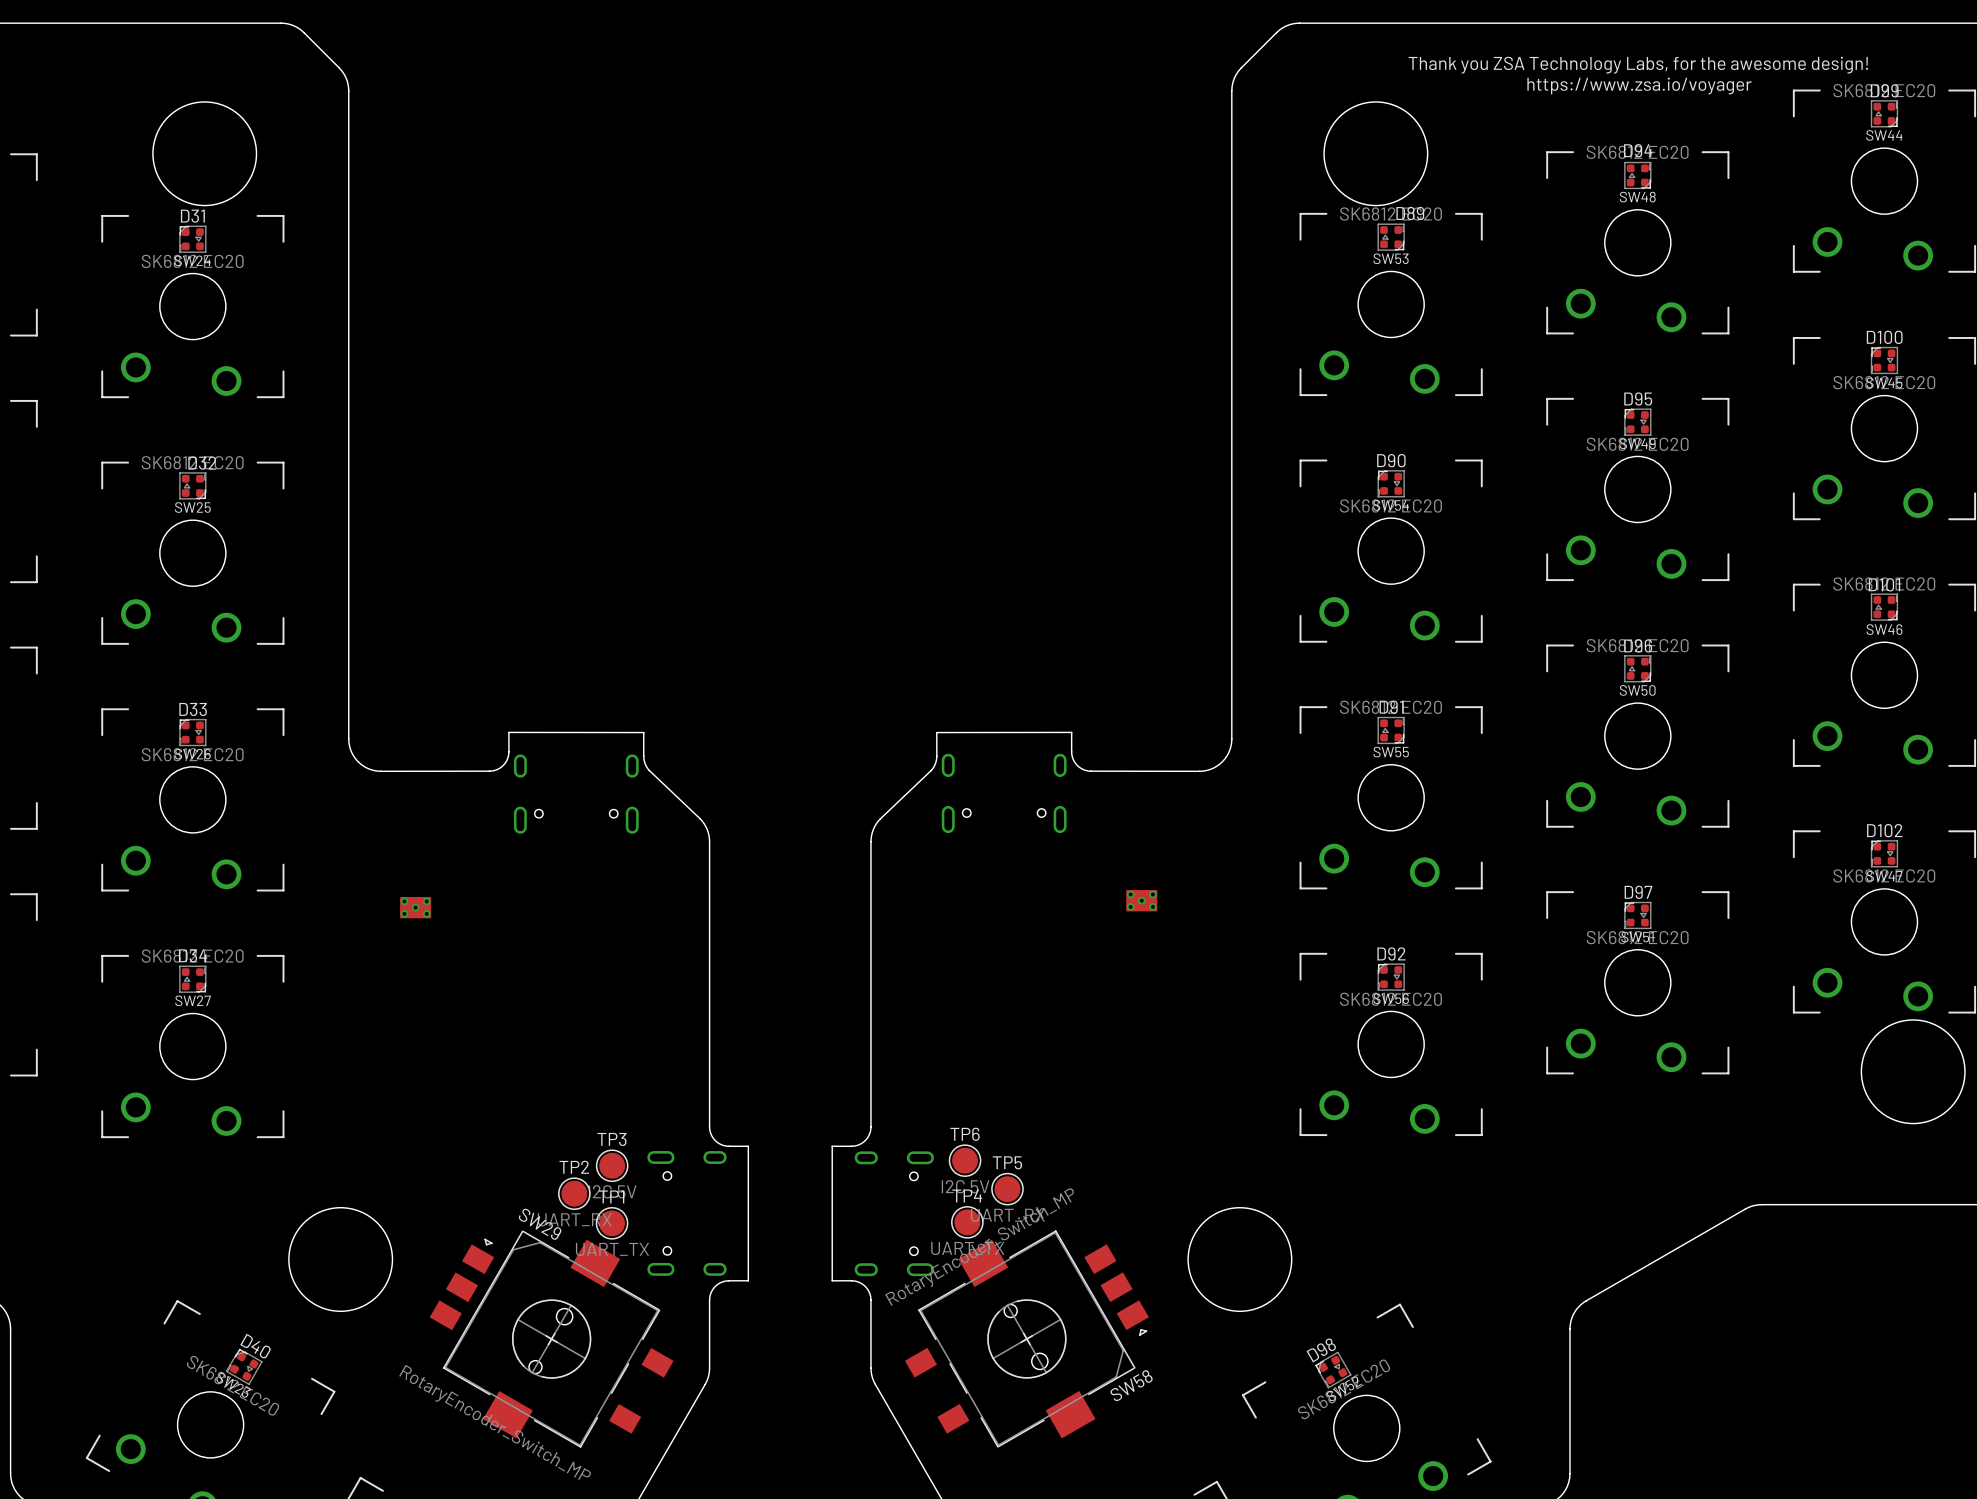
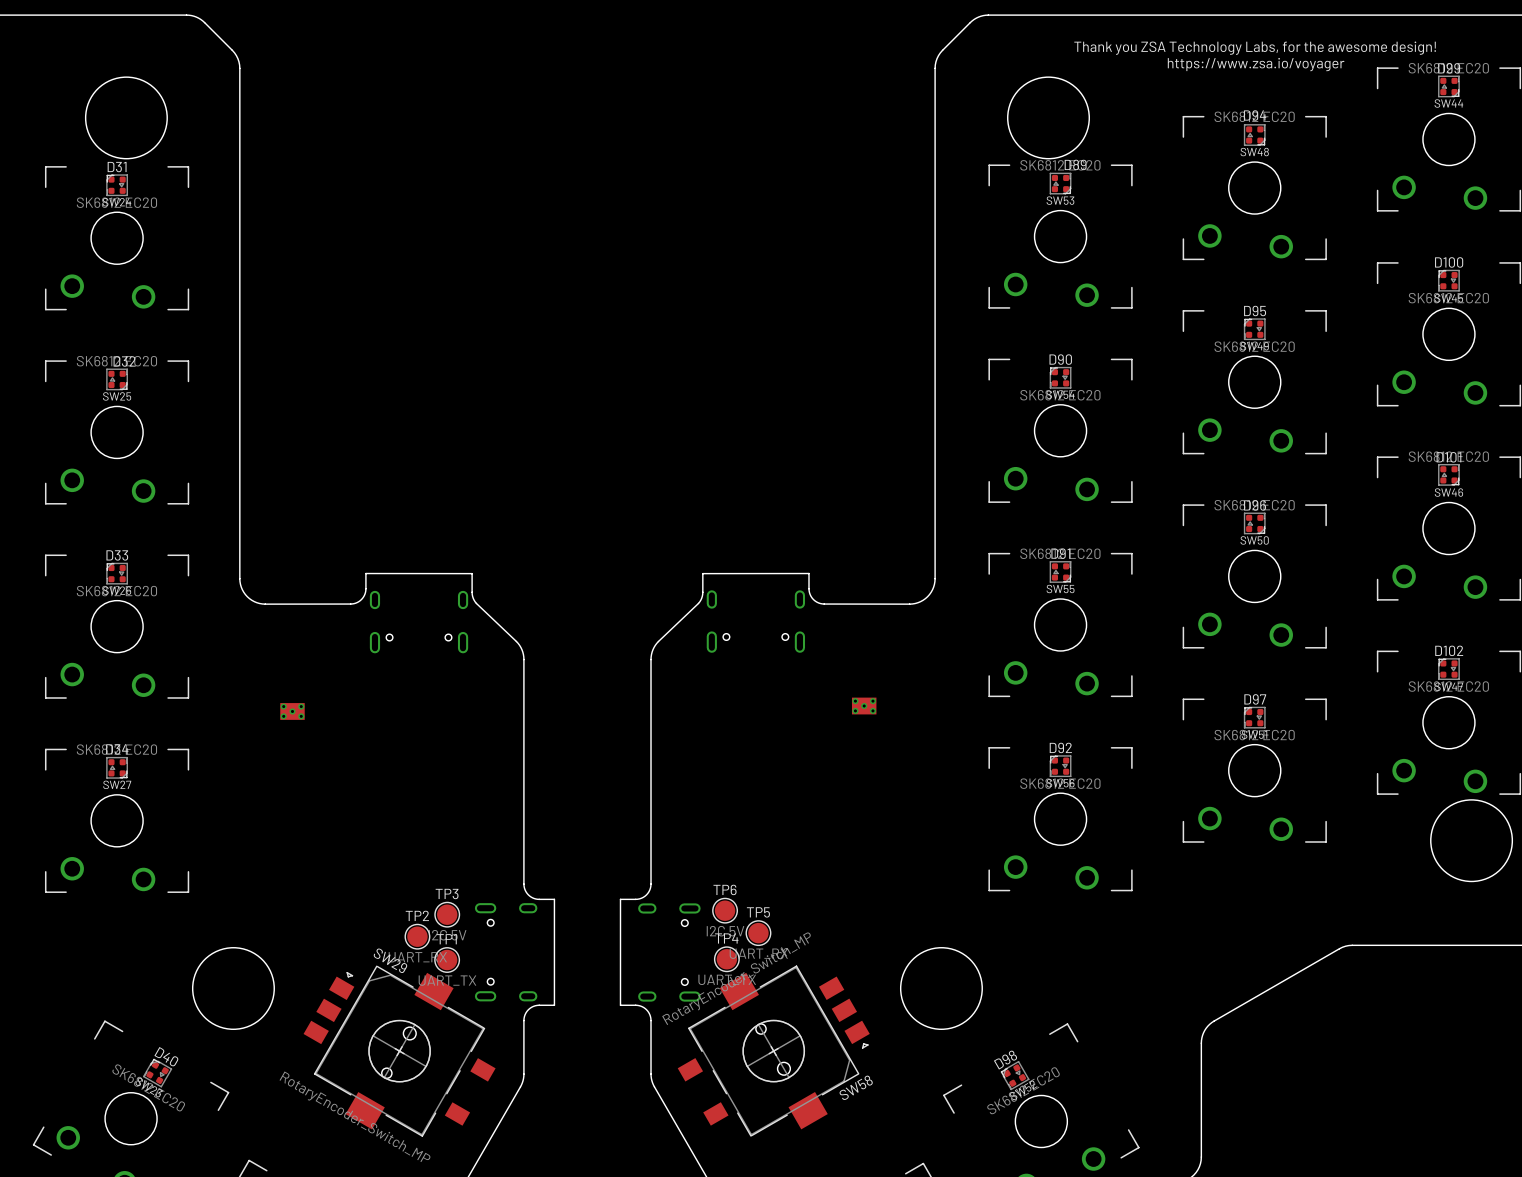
SW29 footprint: [429, 1230, 674, 1448] -> [303, 965, 496, 1137]
SW58 footprint: [904, 1230, 1149, 1448] -> [677, 965, 870, 1137]

